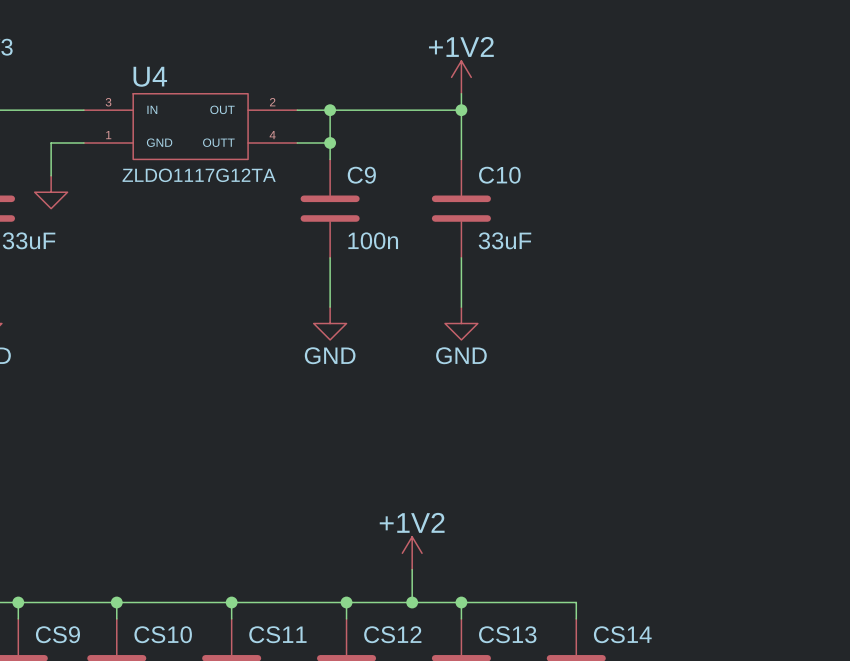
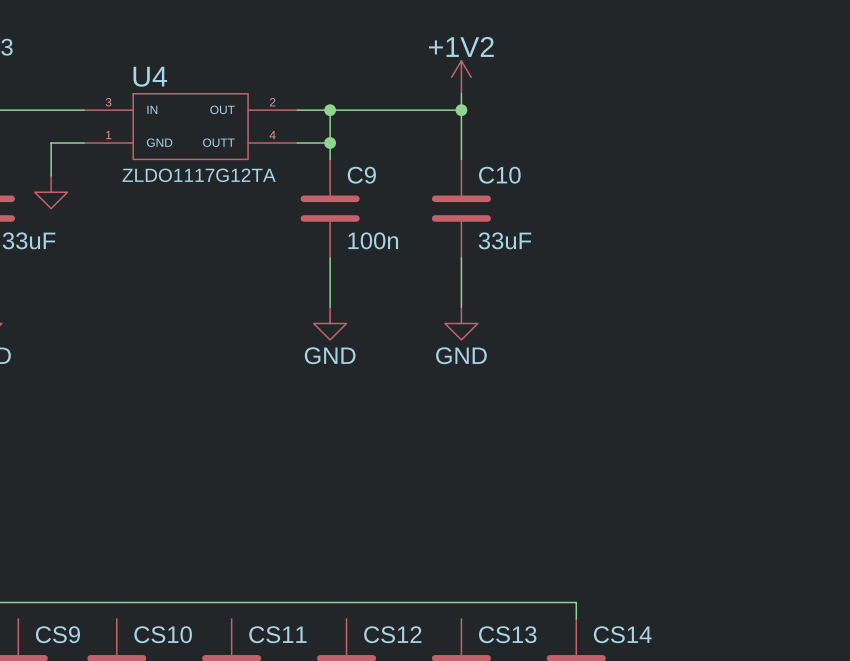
power symbol: +1V2 (412, 553) -> none
wire: (412, 569) (412, 602) -> none
wire: (18, 602) (18, 618) -> none
junction: (18, 602) -> none
wire: (116, 602) (116, 618) -> none
junction: (116, 602) -> none
wire: (231, 602) (231, 618) -> none
junction: (231, 602) -> none
wire: (346, 602) (346, 618) -> none
junction: (346, 602) -> none
junction: (412, 602) -> none
wire: (461, 602) (461, 618) -> none
junction: (461, 602) -> none

